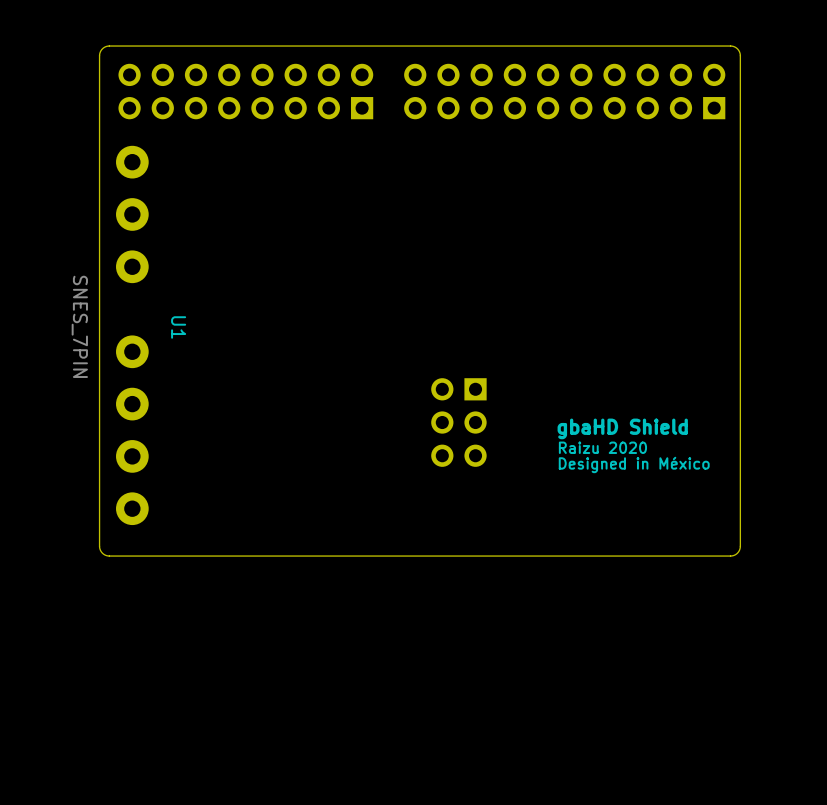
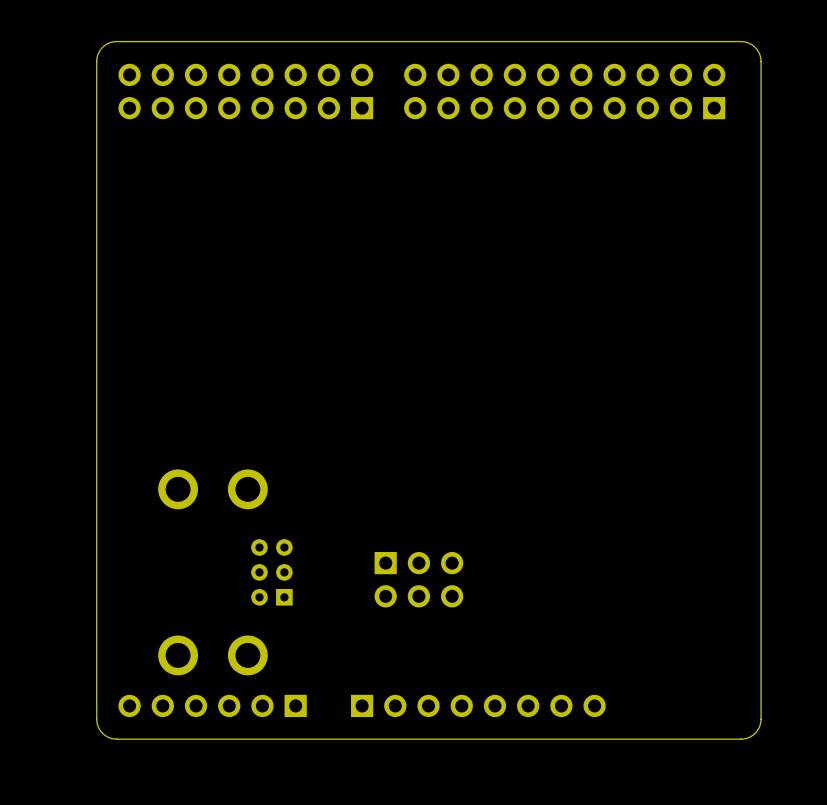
board edge: (730, 46) (109, 46) (103, 48) (99, 55) (99, 546) (101, 552) (109, 556) (730, 556) (736, 554) (740, 546) (740, 55) (737, 48) (730, 46) -> (741, 41) (748, 43) (755, 47) (759, 53) (761, 61) (761, 719) (759, 726) (755, 733) (748, 737) (741, 739) (116, 739) (109, 737) (102, 733) (98, 726) (96, 719) (96, 61) (98, 53) (102, 47) (109, 43) (116, 41) (741, 41)
U1: SNES_7PIN (132, 335) -> none
part rotation: 0° (458, 422) -> 90° counterclockwise (418, 579)
part position: (458, 422) -> (418, 579)
text: gbaHD Shield (622, 428) -> none
text: Raizu 2020 (602, 447) -> none
text: Designed in México (634, 464) -> none
part: none -> (225, 572)
part: none -> (212, 705)
part: none -> (478, 705)

